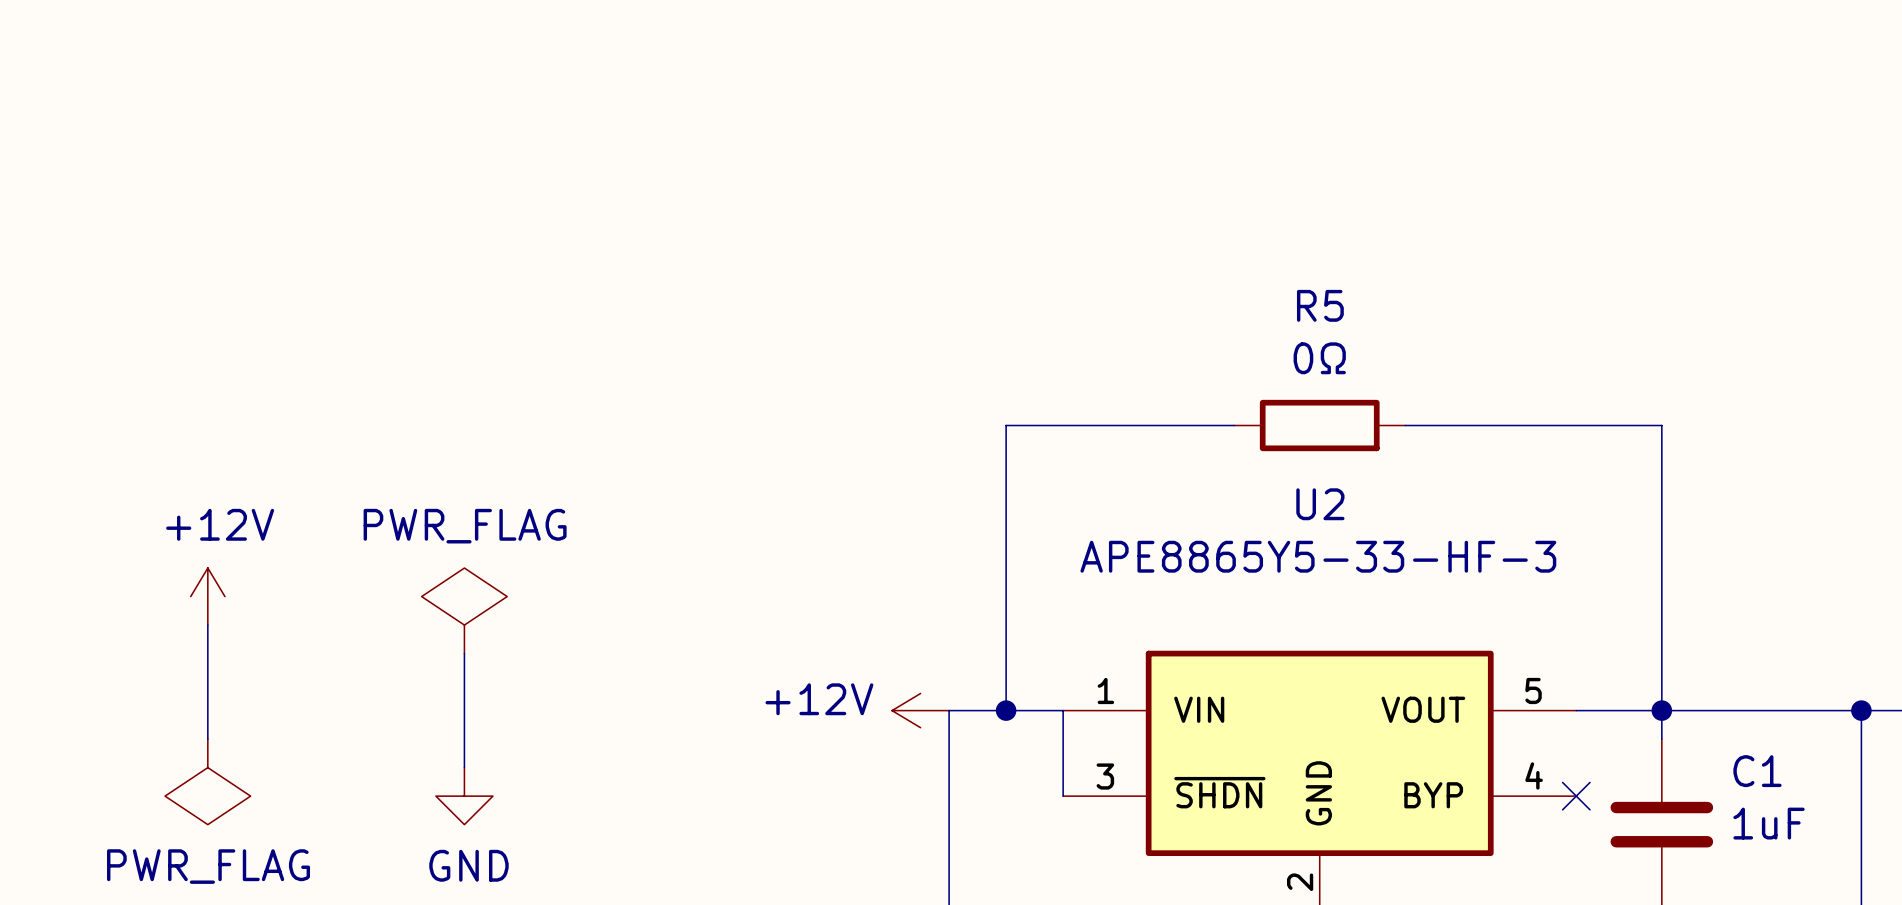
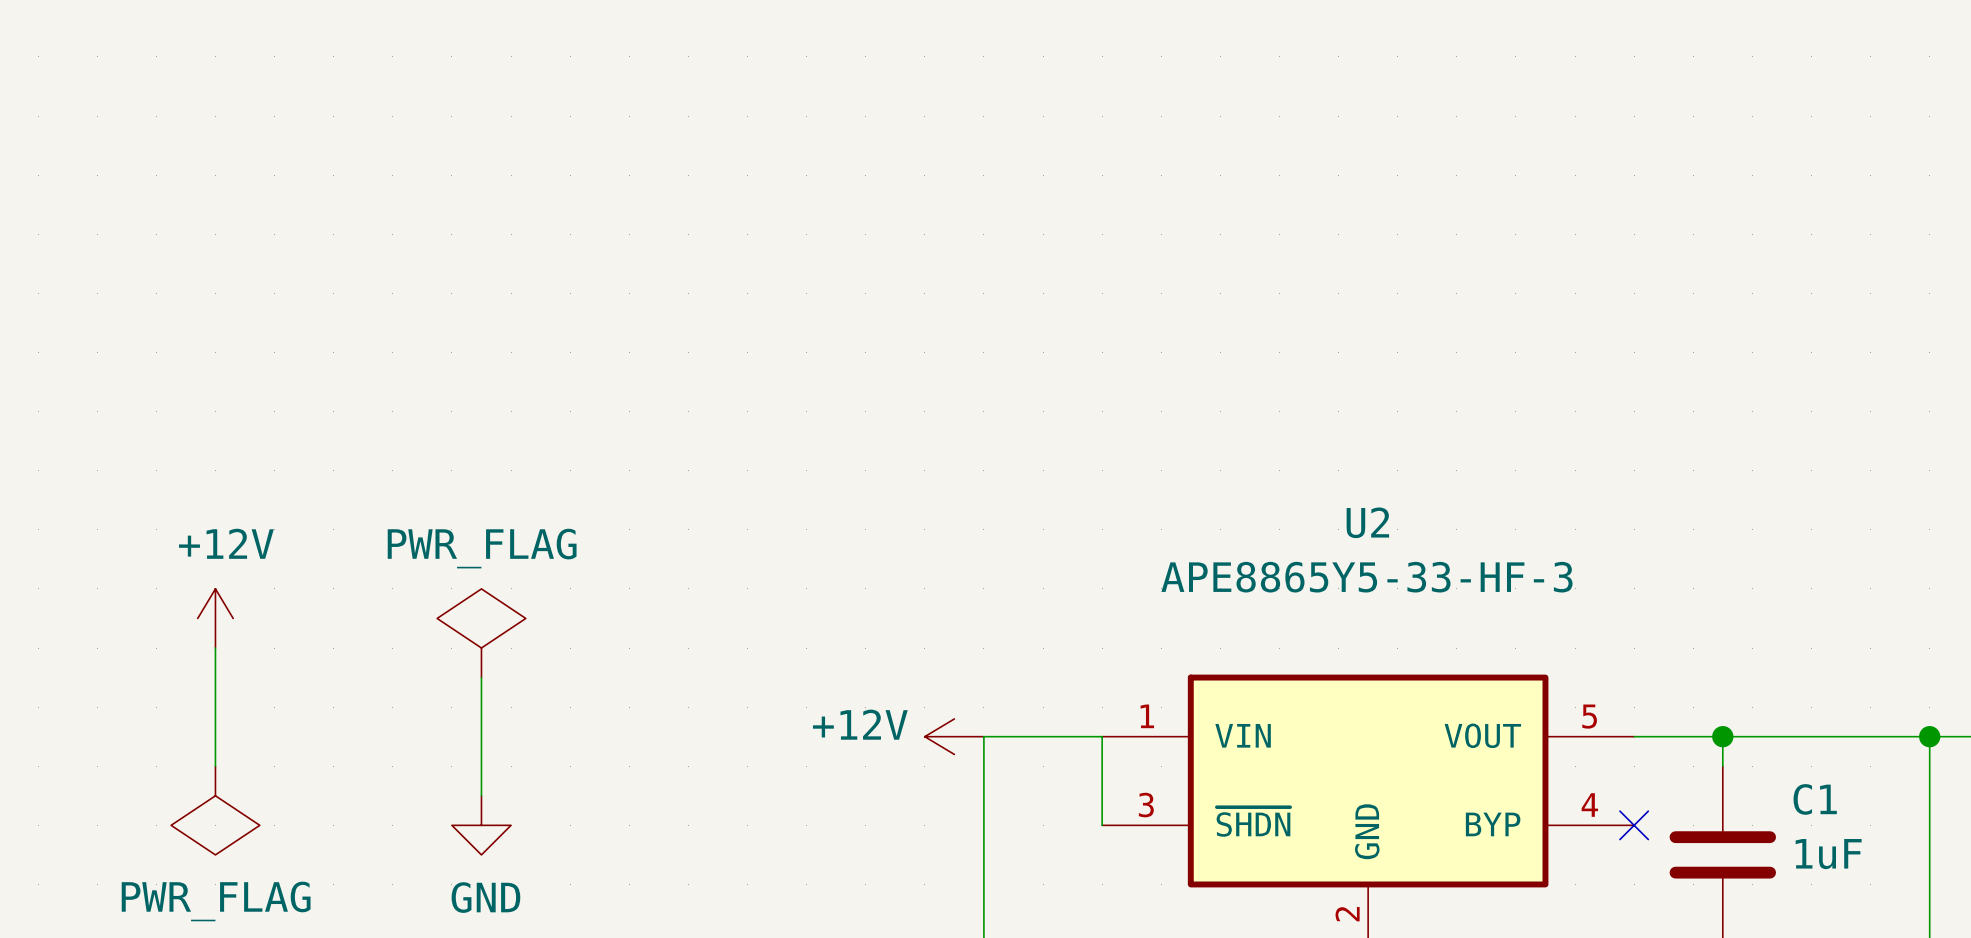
wire: (1234, 425) (1006, 425) (1006, 710) -> none
R5: 0Ω (1319, 425) -> none
wire: (1405, 425) (1661, 425) (1661, 710) -> none
junction: (1006, 710) -> none

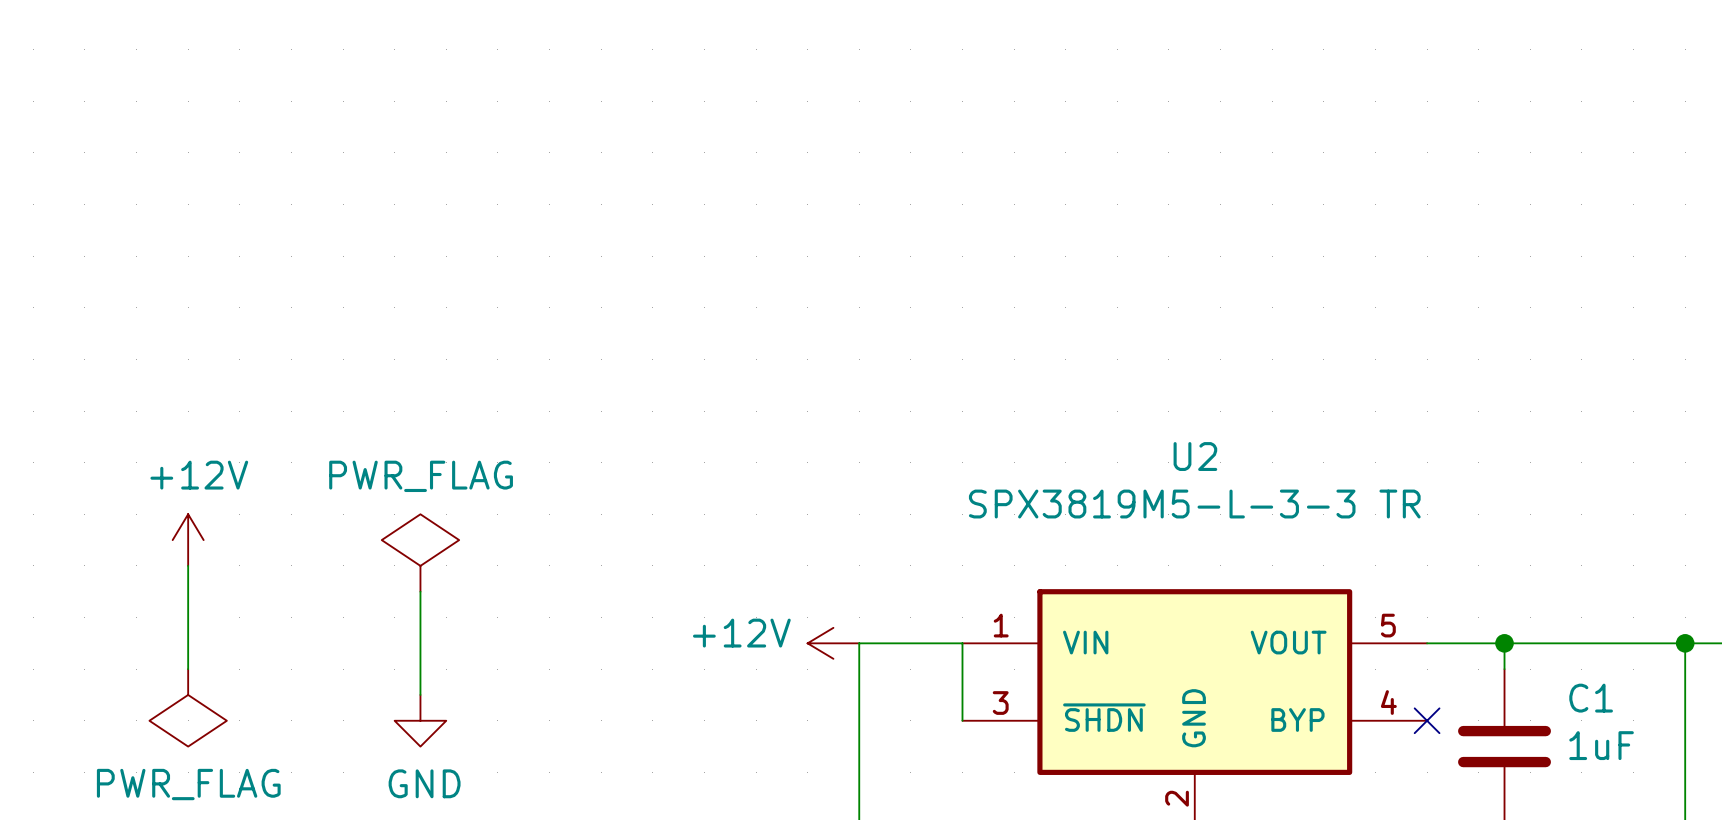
U2 value: APE8865Y5-33-HF-3 (1366, 577) -> SPX3819M5-L-3-3 TR (1194, 504)

